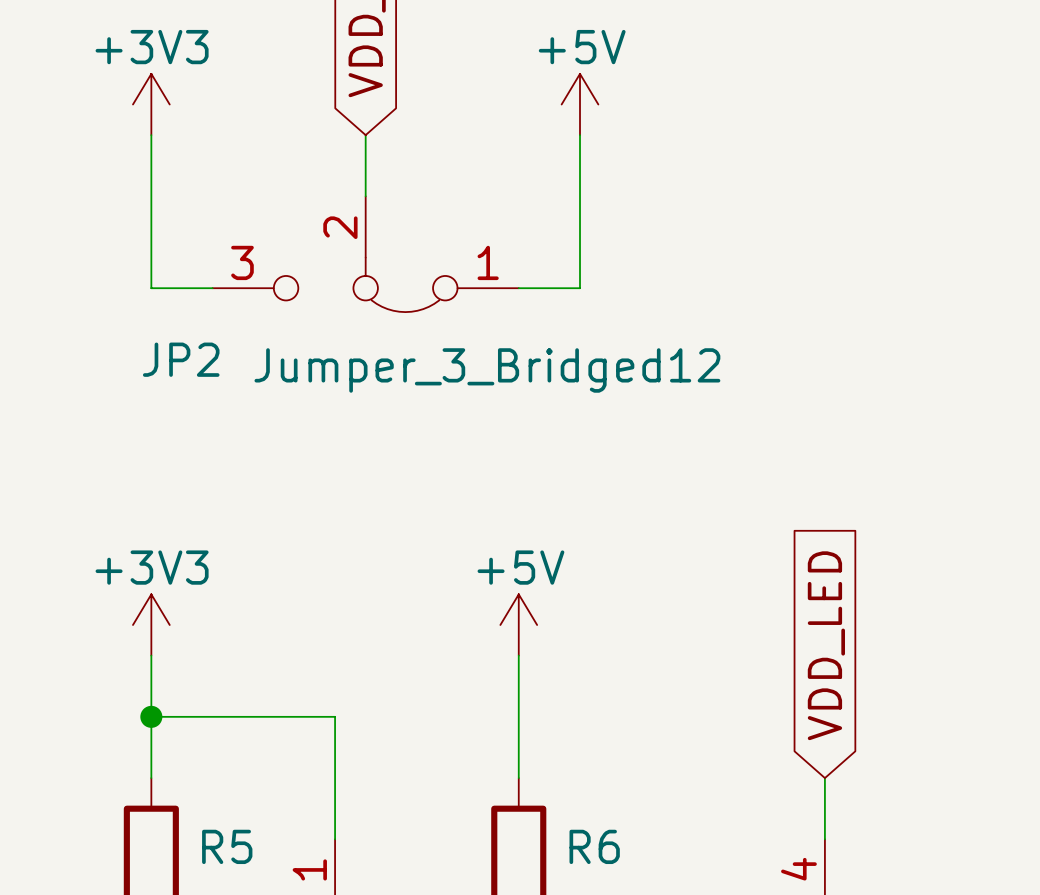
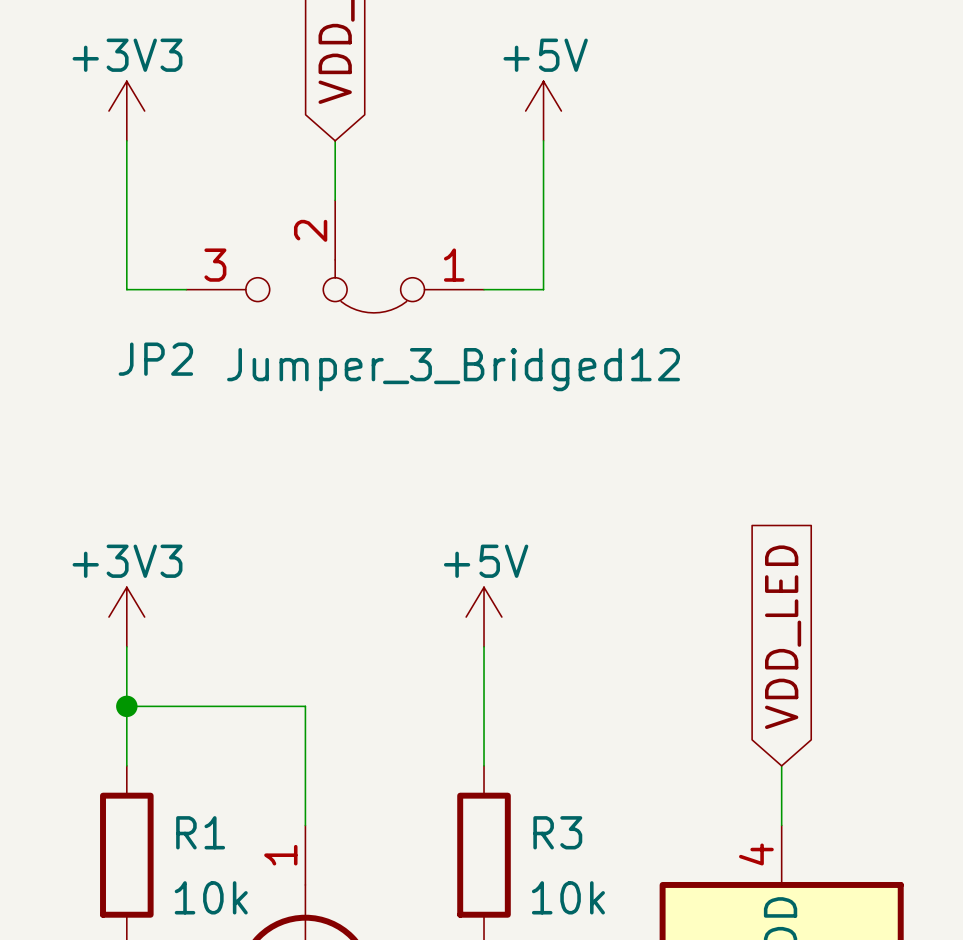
R5 name: R5 (227, 846) -> R1 (200, 832)
R6 name: R6 (594, 846) -> R3 (557, 832)

